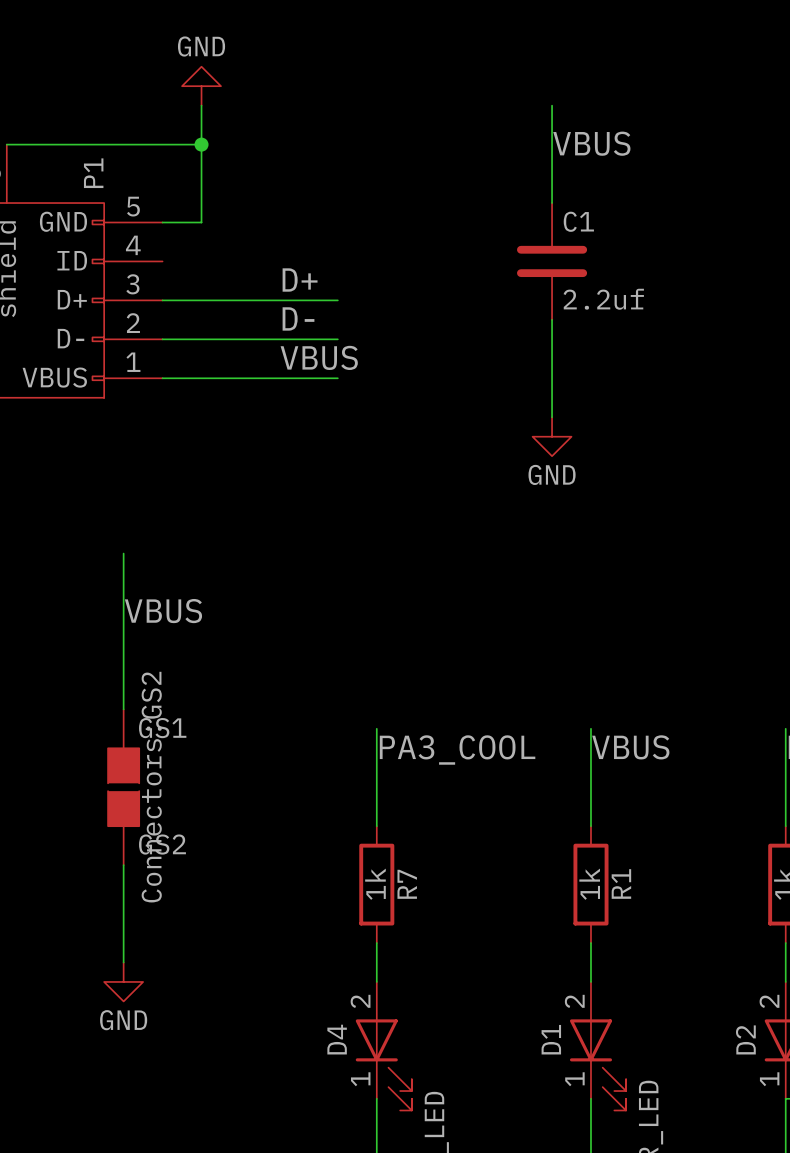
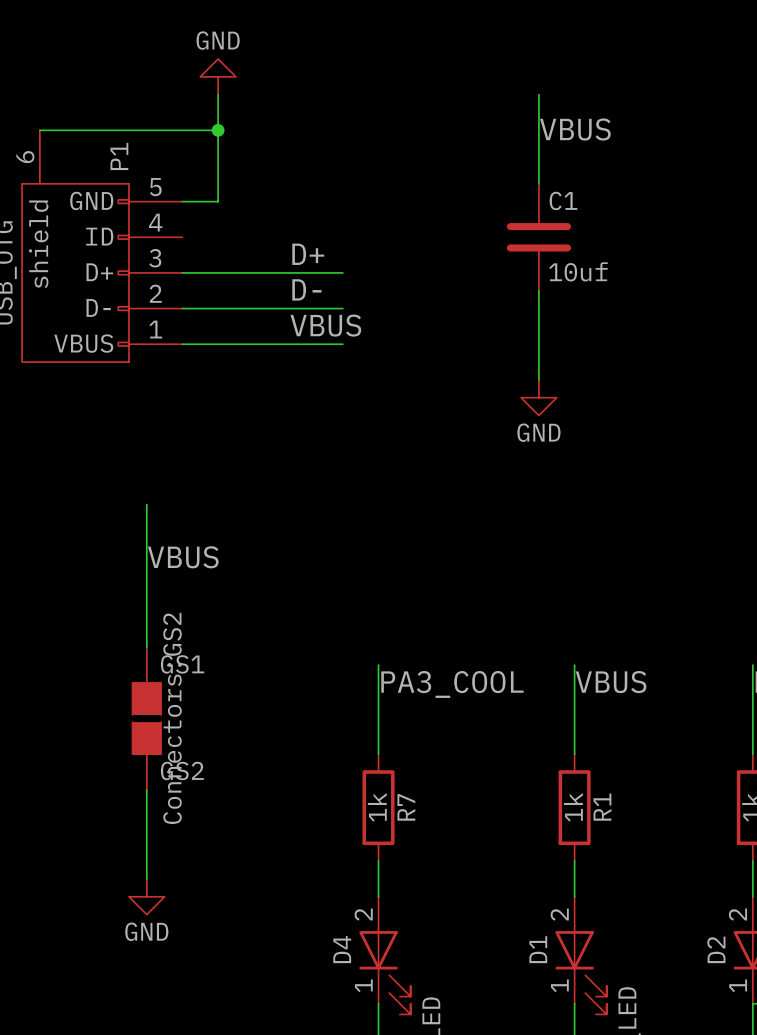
C1 value: 2.2uf (603, 299) -> 10uf (578, 271)

